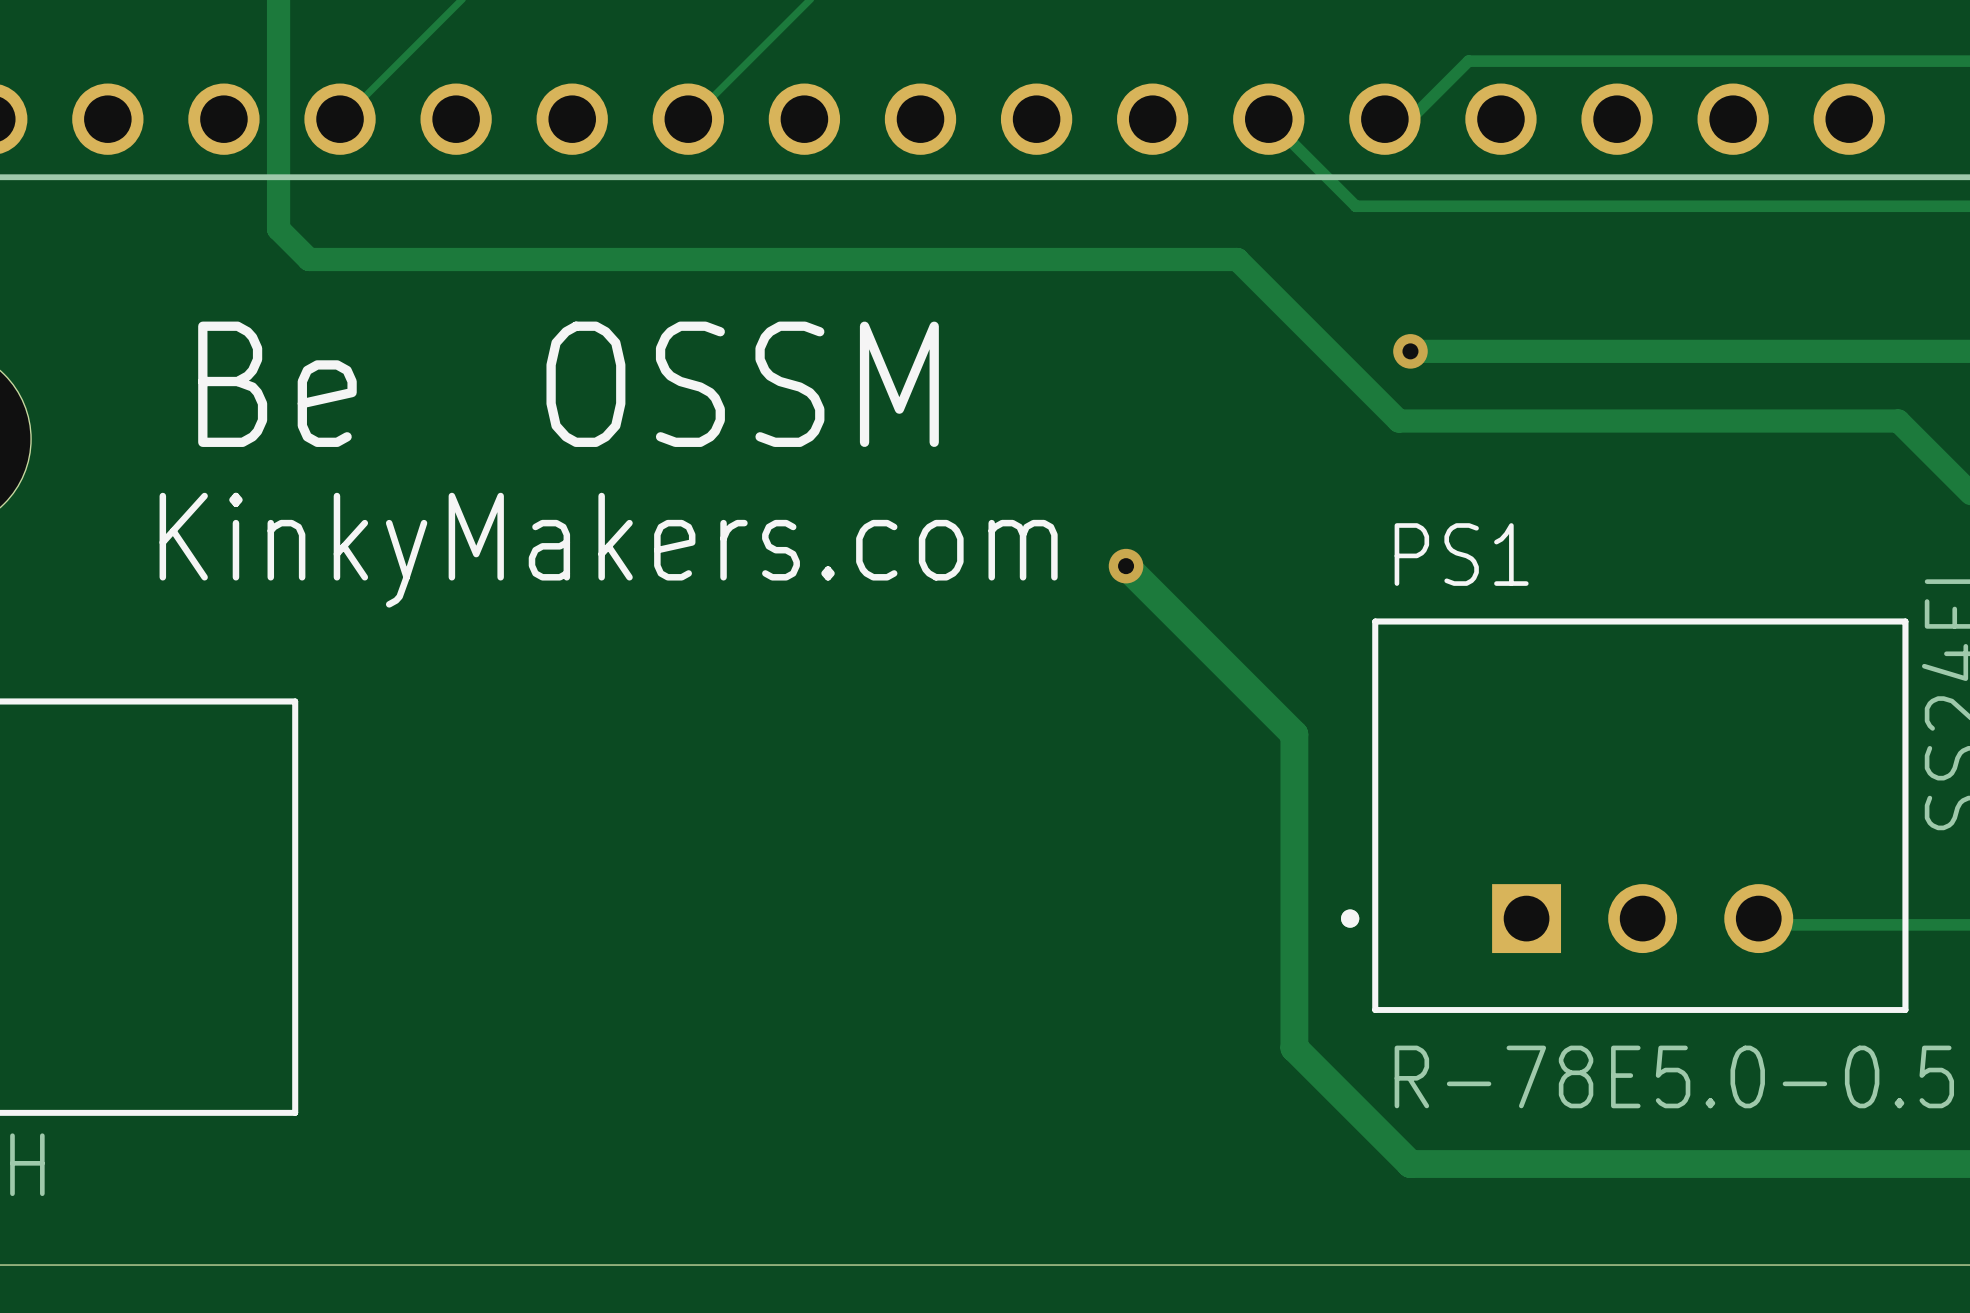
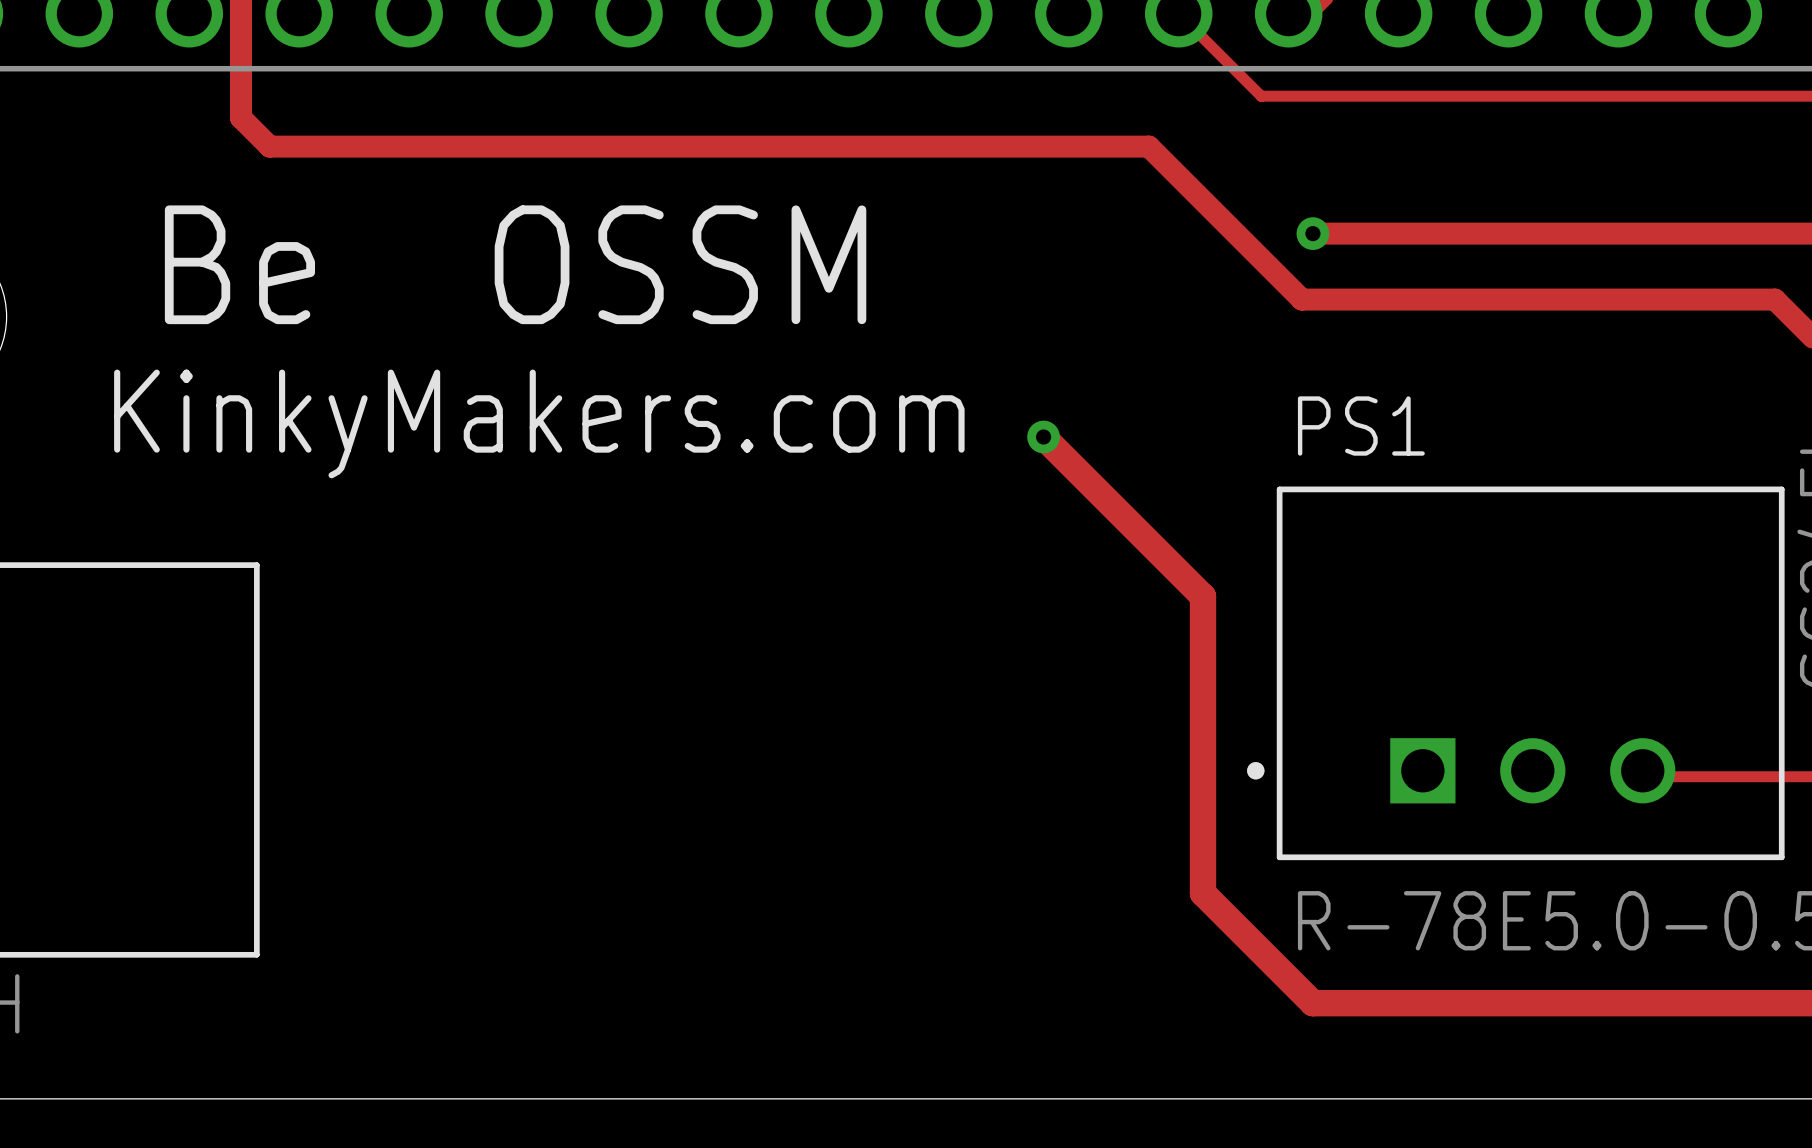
text position: KinkyMakers.com (608, 550) -> KinkyMakers.com (539, 423)

